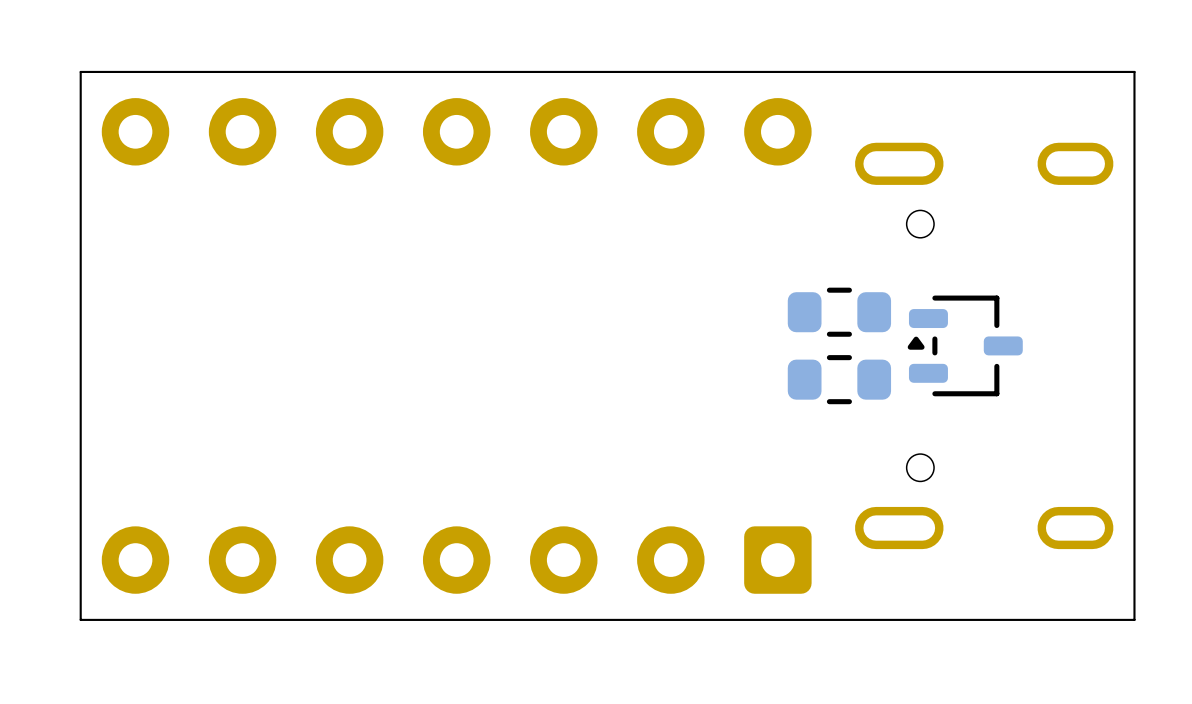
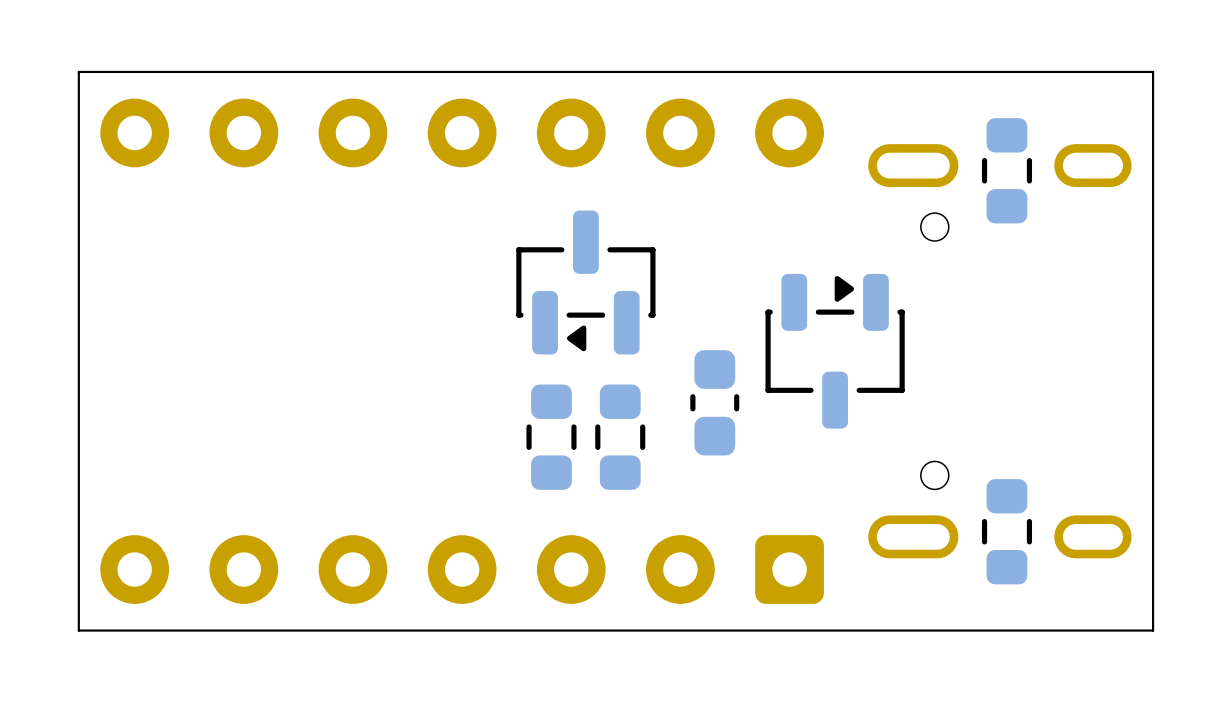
part: none -> (1006, 170)
part: none -> (585, 282)
part: (839, 312) -> none
part: none -> (835, 351)
part: (965, 345) -> none
part: (839, 379) -> none
part: none -> (714, 402)
part: none -> (551, 437)
part: none -> (620, 437)
part: none -> (1006, 531)

